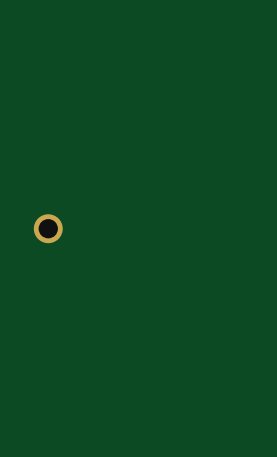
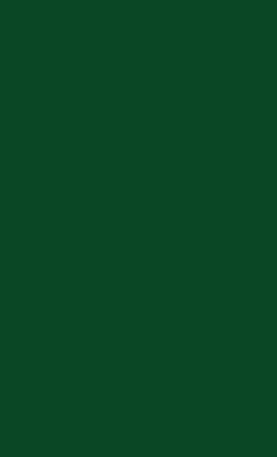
via: (48, 228) -> none

